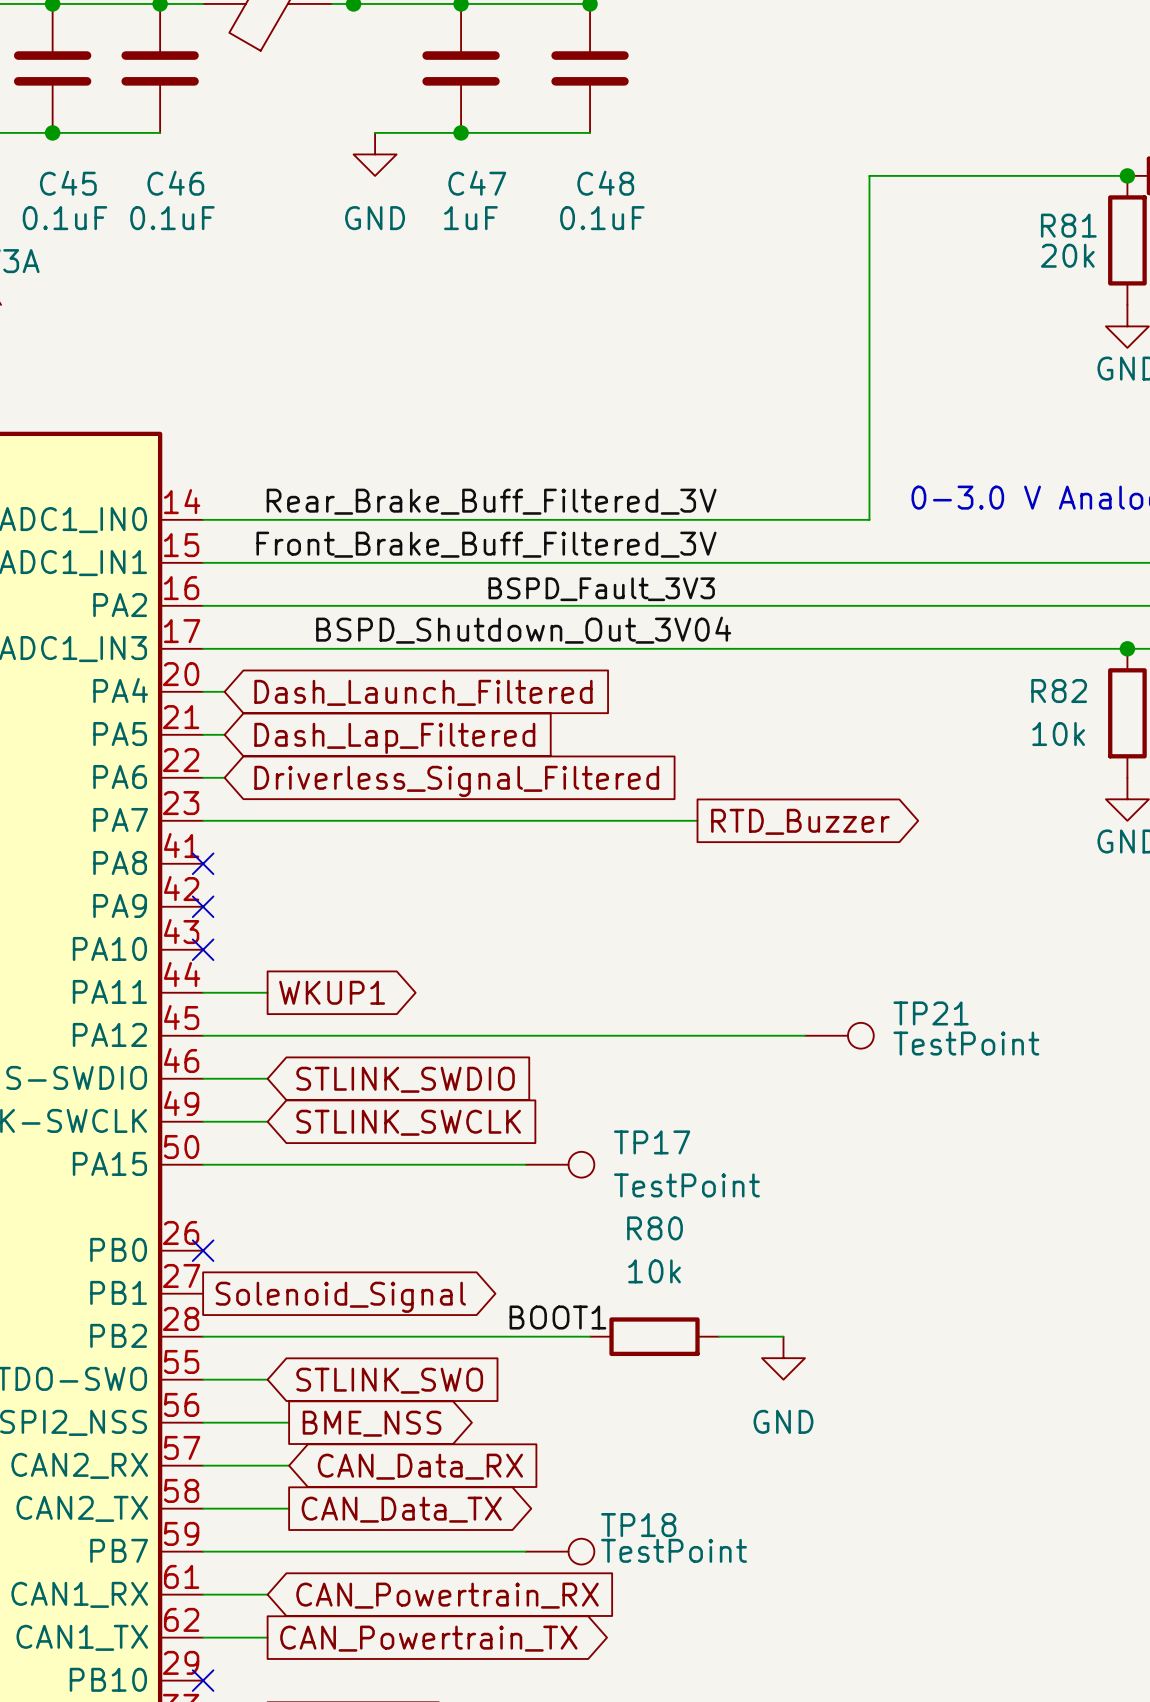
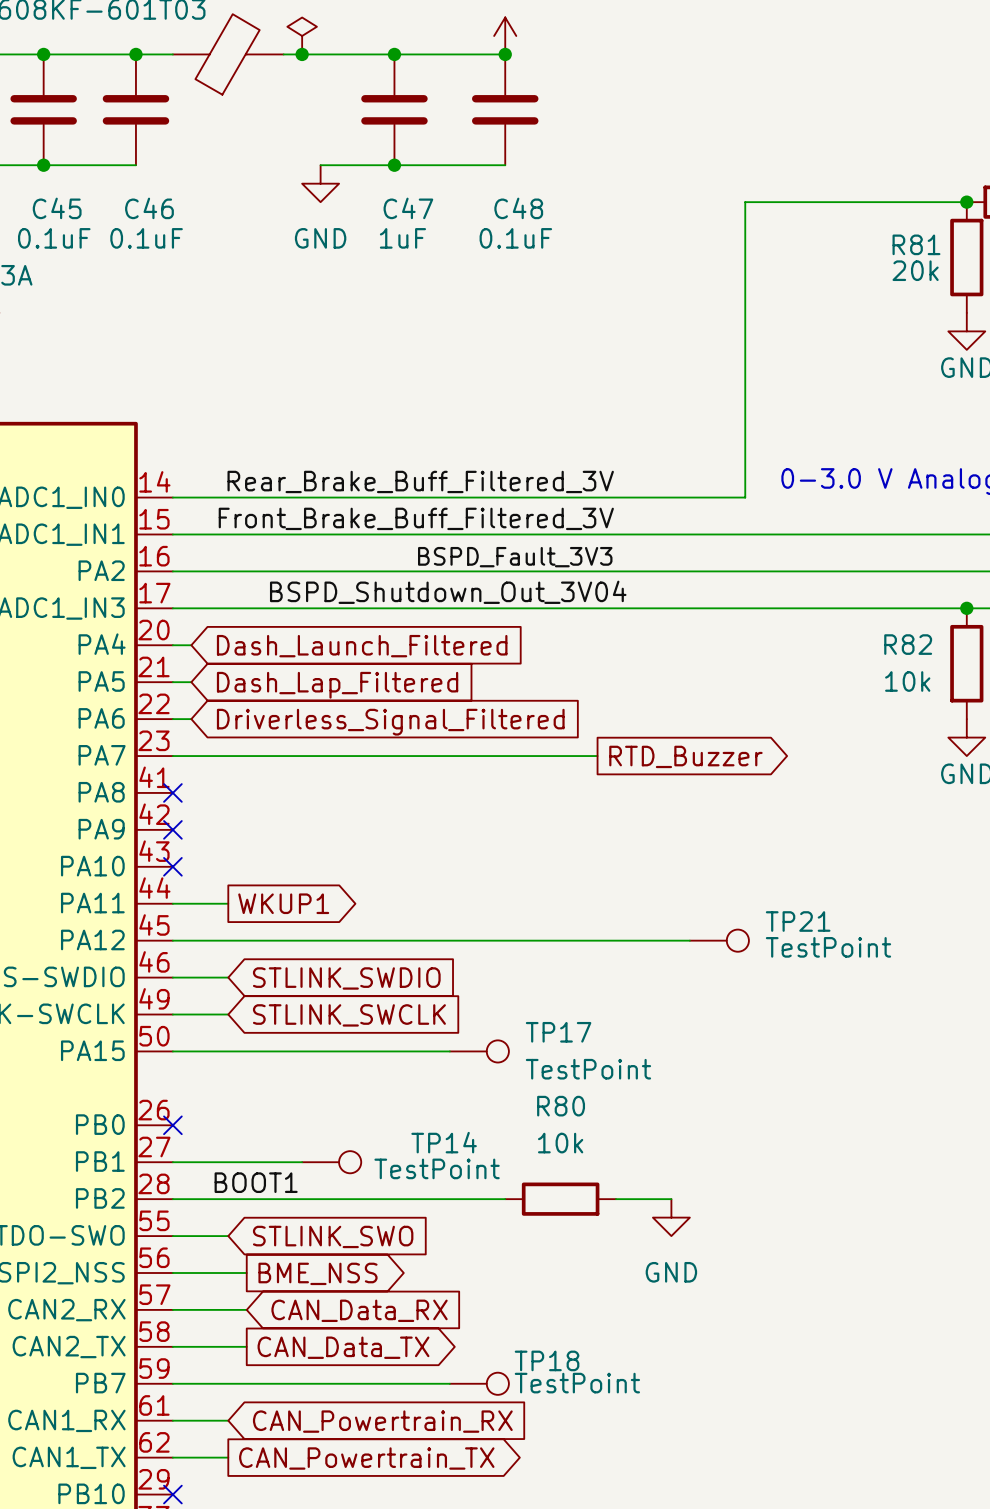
wire: none -> (172, 1162) (302, 1162)
TP14: none -> TestPoint (331, 1162)
global label: Solenoid_Signal (340, 1297) -> none
label position: BOOT1 (557, 1317) -> BOOT1 (256, 1182)

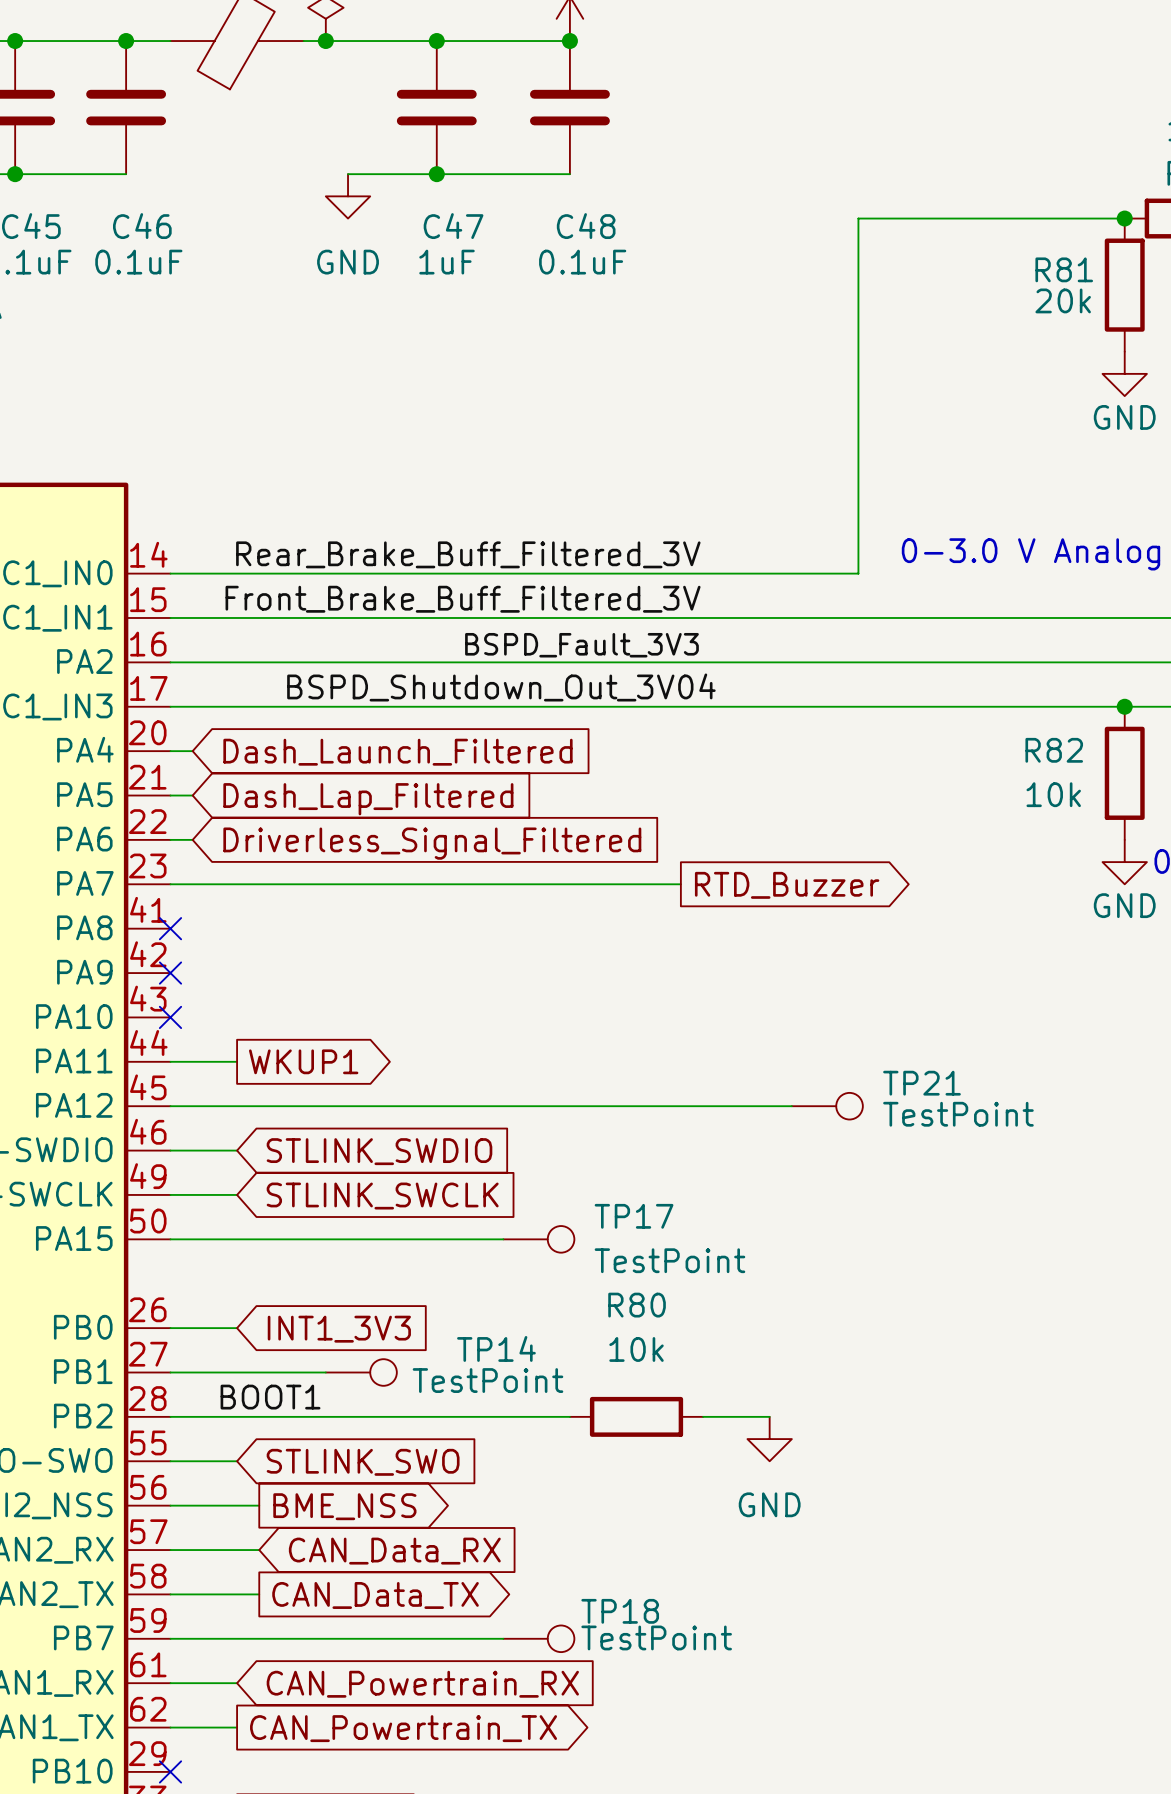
wire: none -> (170, 1328) (237, 1328)
no-connect mark: (172, 1125) -> none
global label: none -> INT1_3V3 (339, 1329)

